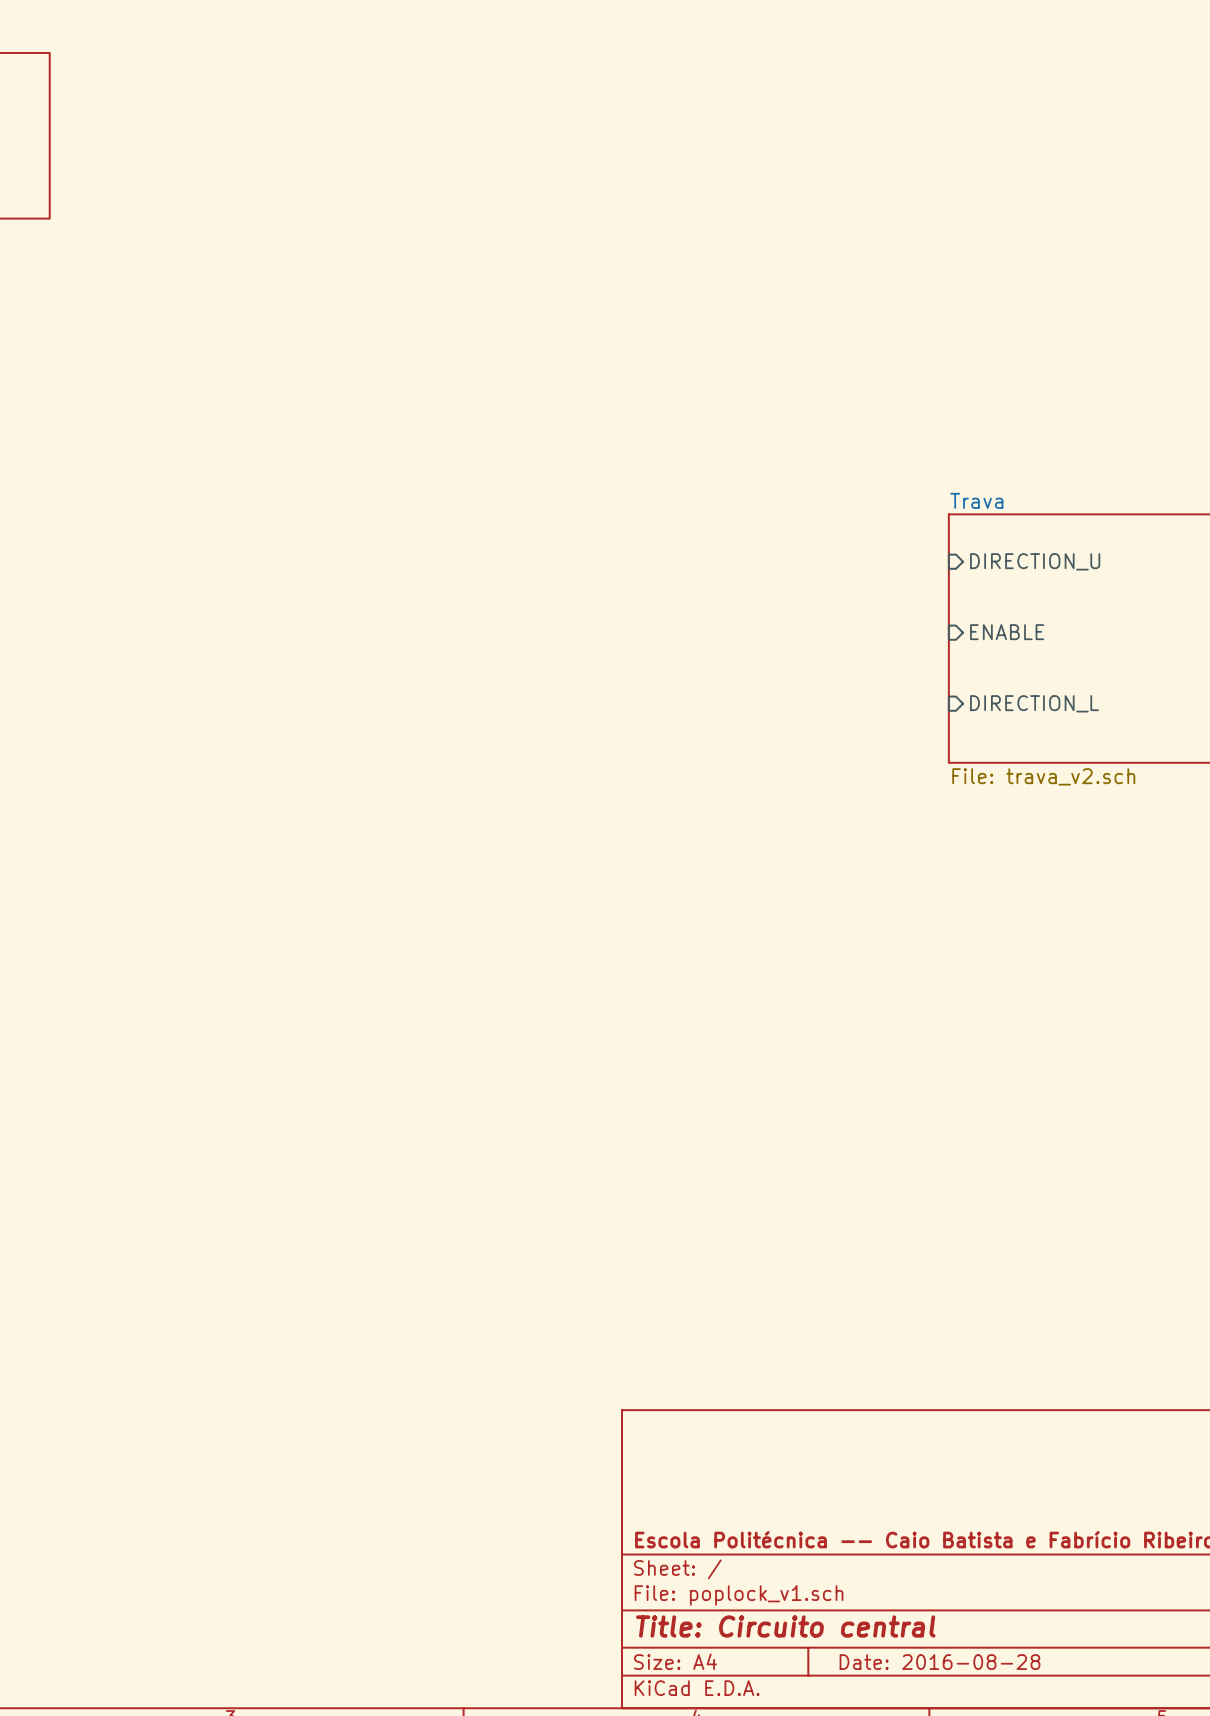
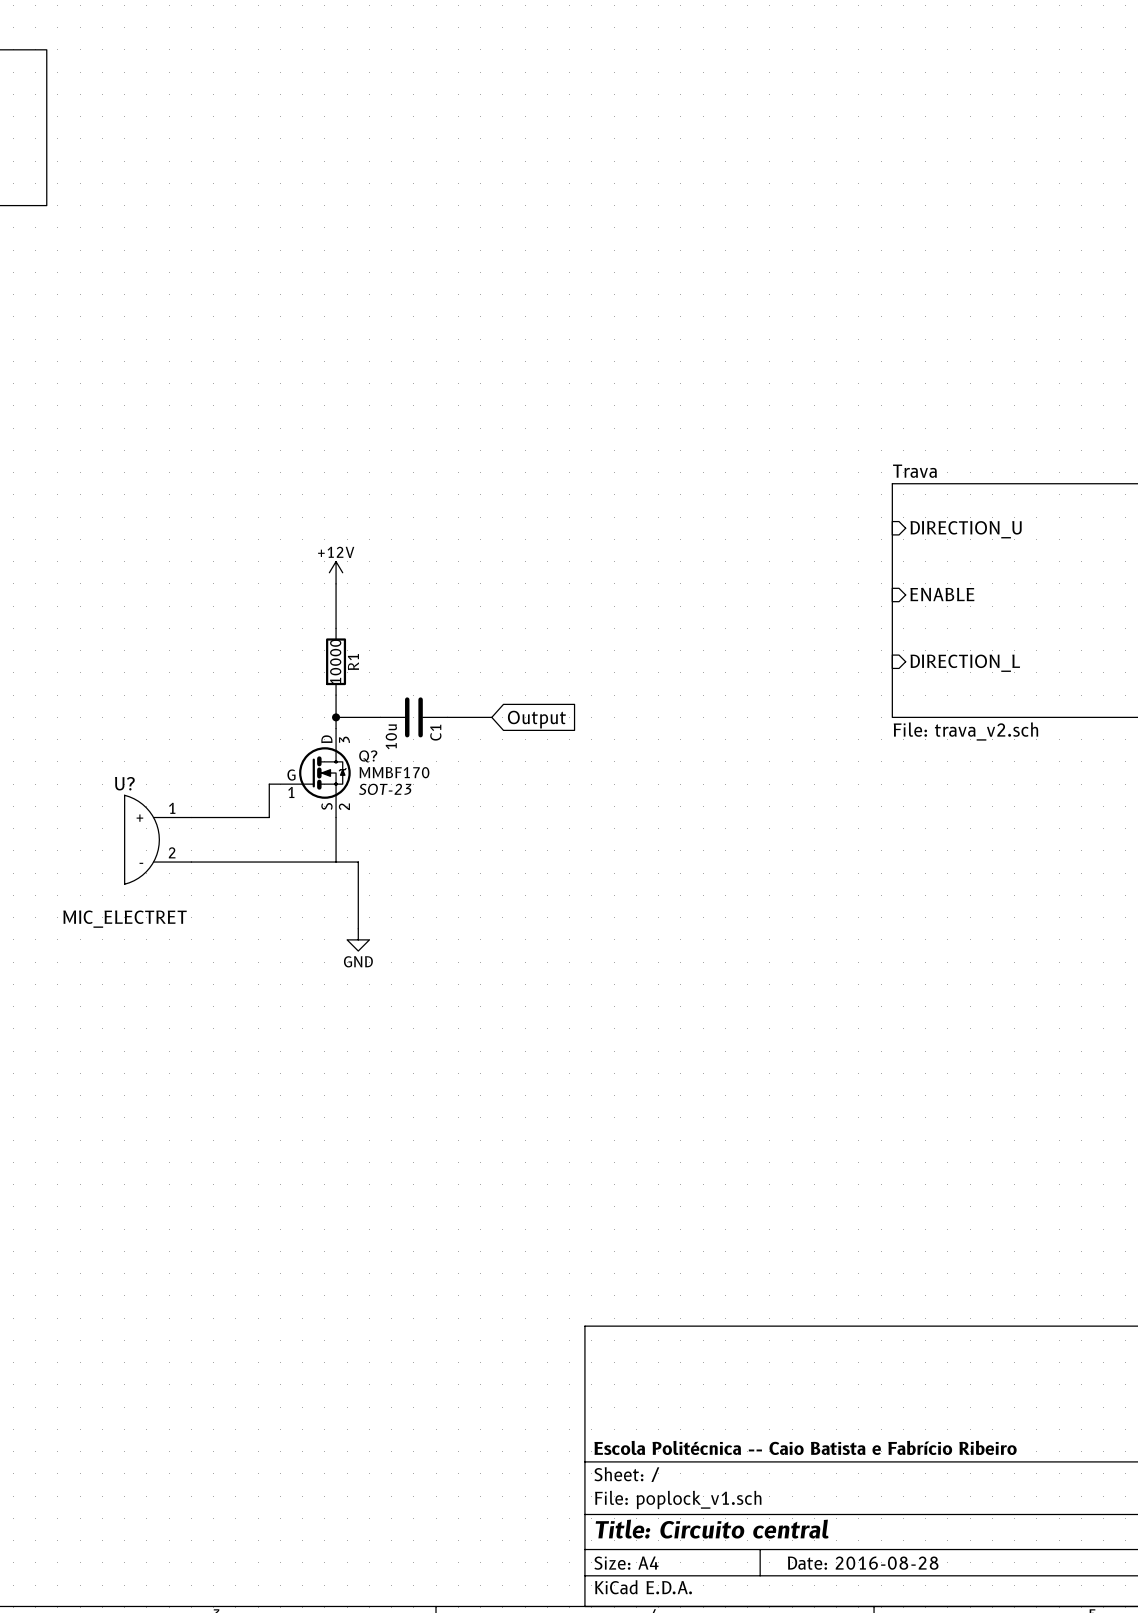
power symbol: none -> +12V (336, 572)
wire: none -> (336, 583) (336, 628)
R1: none -> 10000 (336, 661)
wire: none -> (336, 695) (336, 728)
wire: none -> (336, 717) (380, 717)
junction: none -> (336, 717)
C1: none -> 10u (413, 717)
wire: none -> (447, 717) (491, 717)
global label: none -> Output (536, 719)
Q?: none -> MMBF170 (310, 773)
wire: none -> (269, 784) (269, 817) (191, 817)
wire: none -> (336, 817) (336, 862)
U?: none -> MIC_ELECTRET (158, 839)
wire: none -> (191, 862) (358, 862) (358, 928)
power symbol: none -> GND (358, 939)

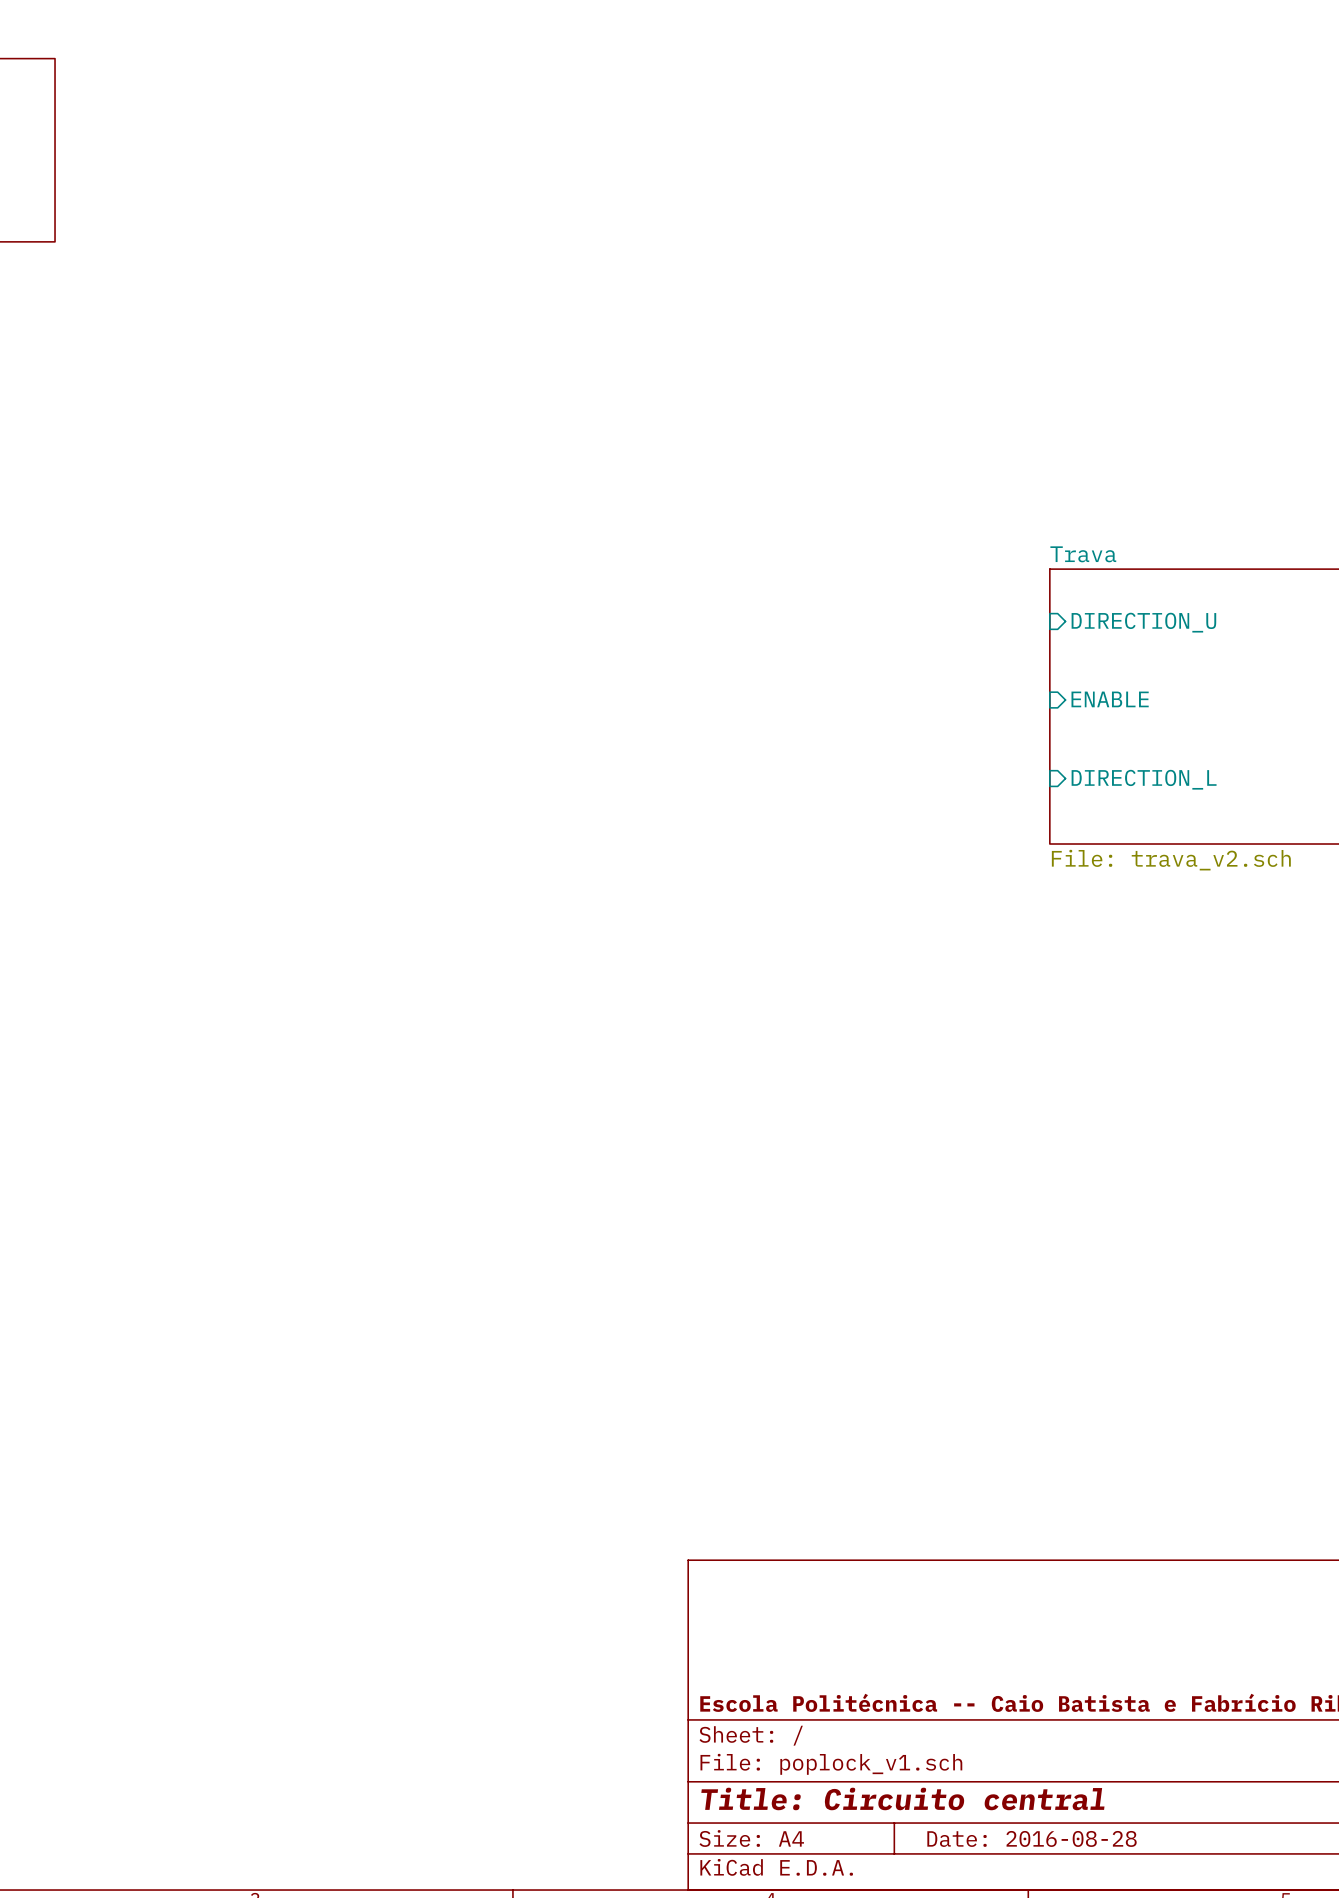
power symbol: +12V (336, 572) -> none
wire: (336, 583) (336, 628) -> none
R1: 10000 (336, 661) -> none
wire: (336, 695) (336, 728) -> none
wire: (336, 717) (380, 717) -> none
junction: (336, 717) -> none
C1: 10u (413, 717) -> none
wire: (447, 717) (491, 717) -> none
global label: Output (536, 719) -> none
Q?: MMBF170 (310, 773) -> none
wire: (269, 784) (269, 817) (191, 817) -> none
wire: (336, 817) (336, 862) -> none
U?: MIC_ELECTRET (158, 839) -> none
wire: (191, 862) (358, 862) (358, 928) -> none
power symbol: GND (358, 939) -> none

